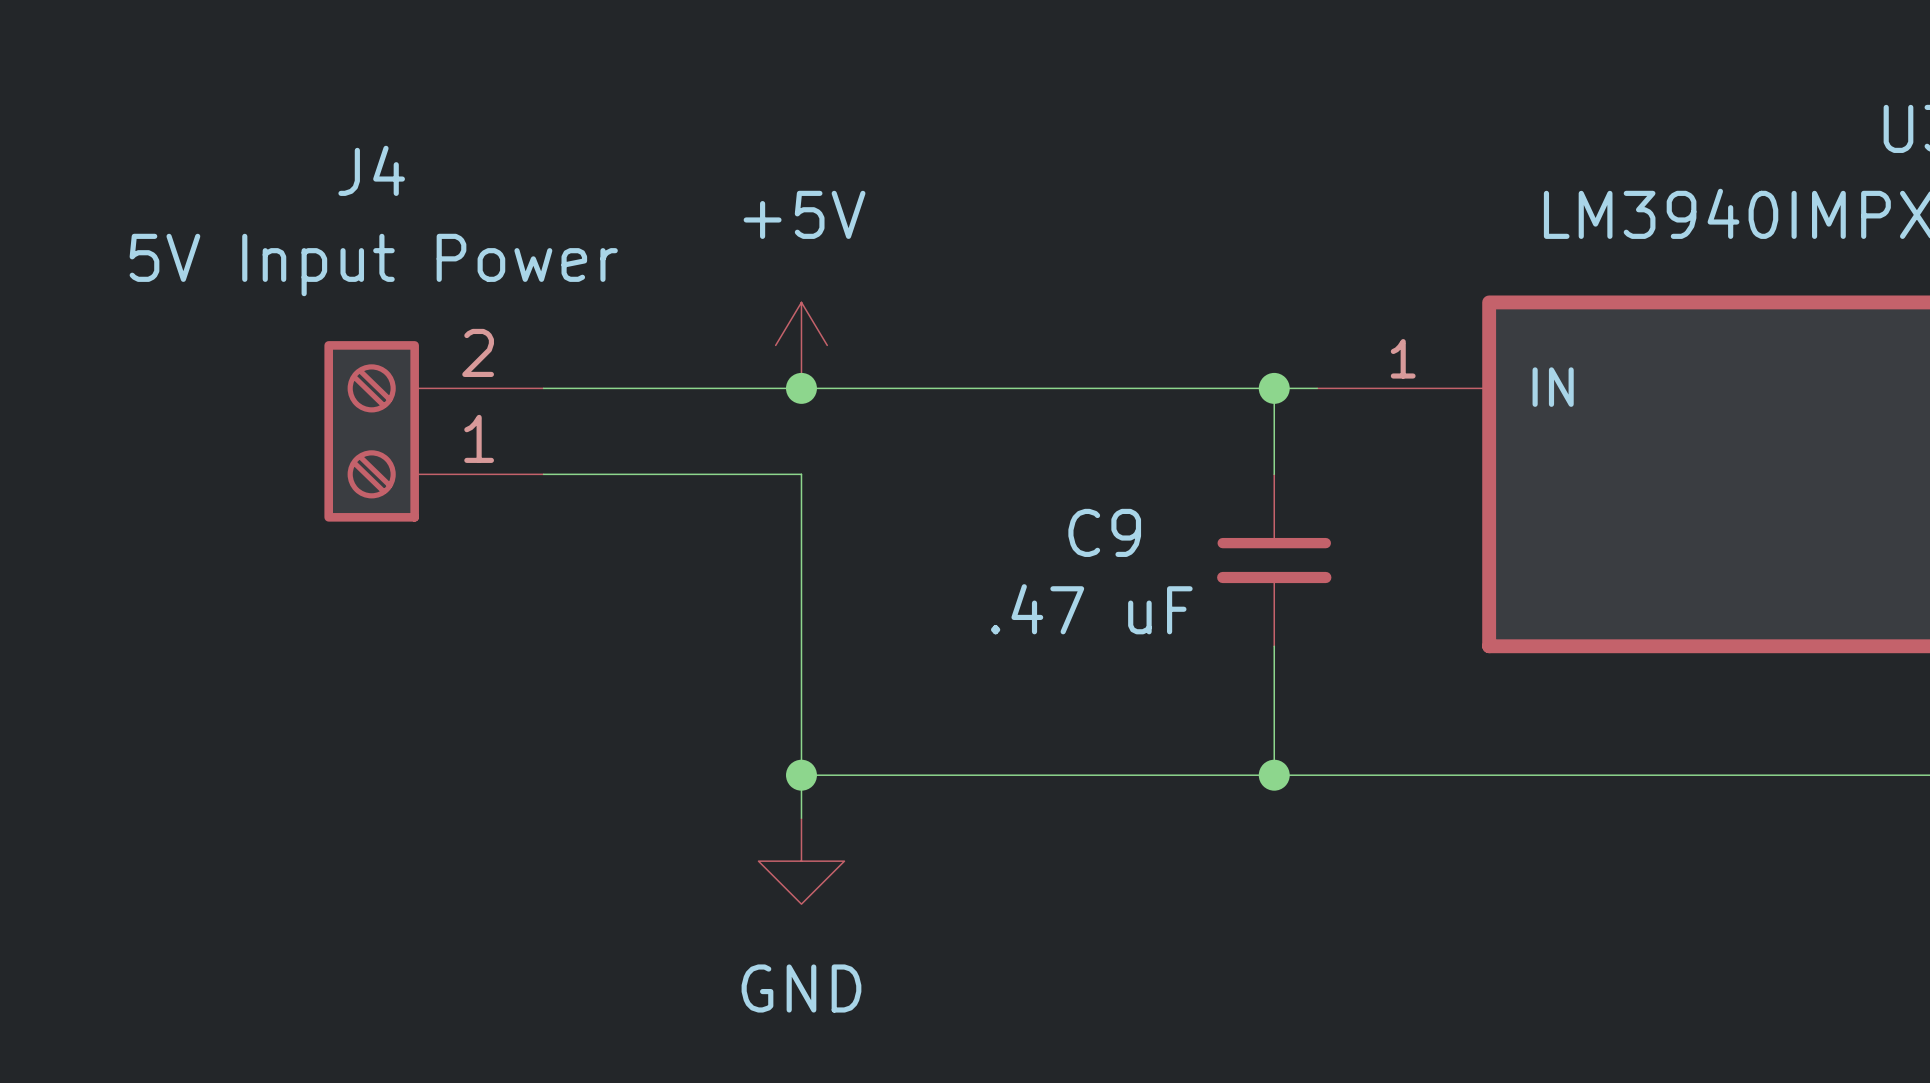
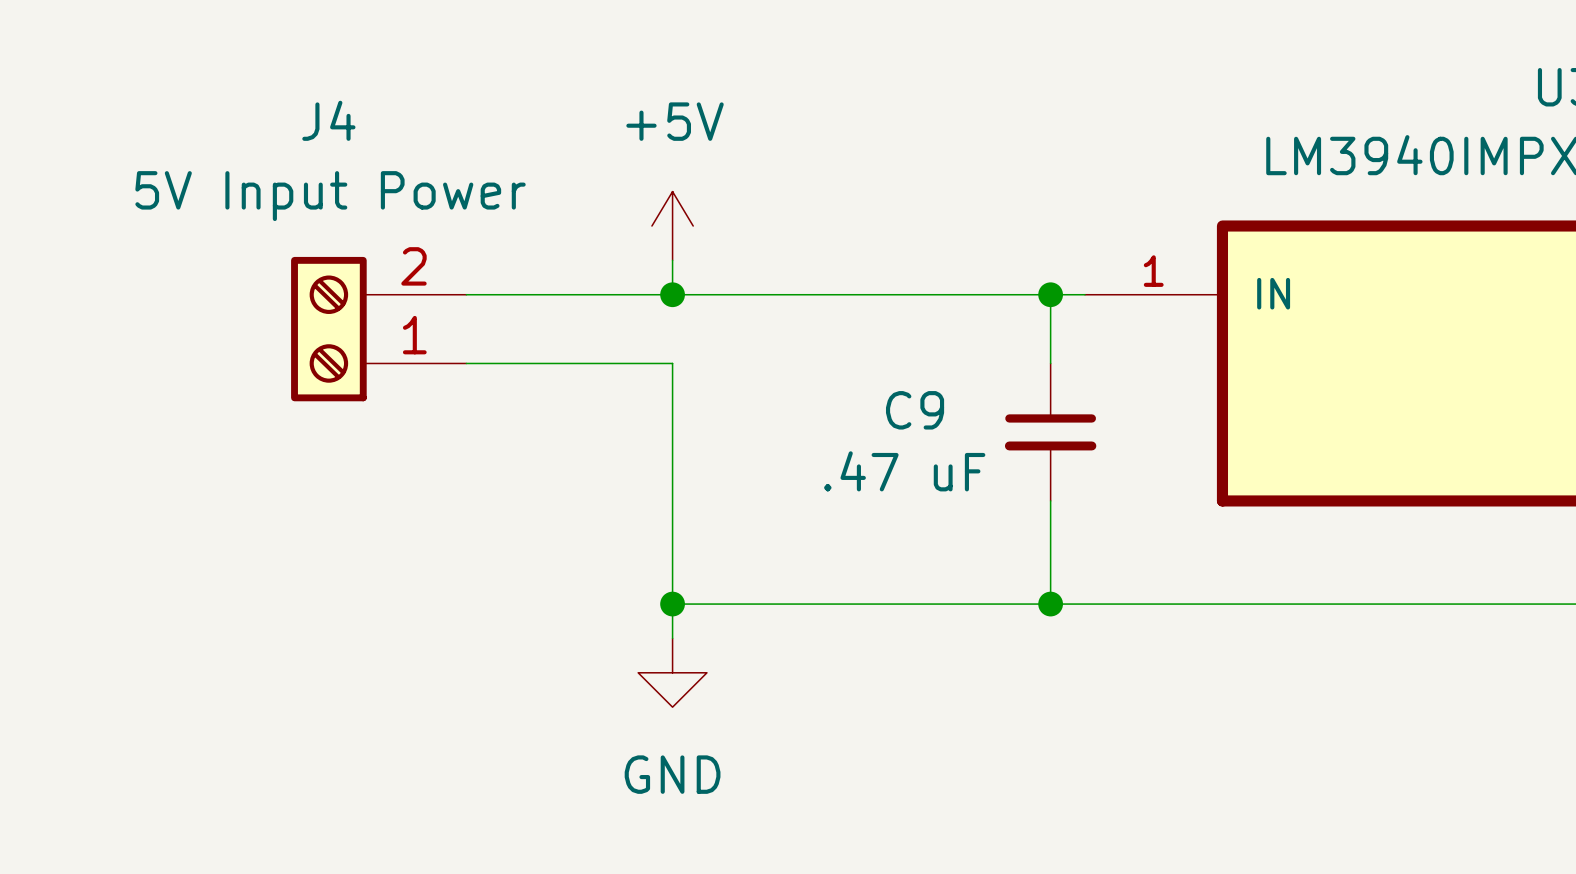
power symbol position: +5V (801, 345) -> +5V (672, 226)

